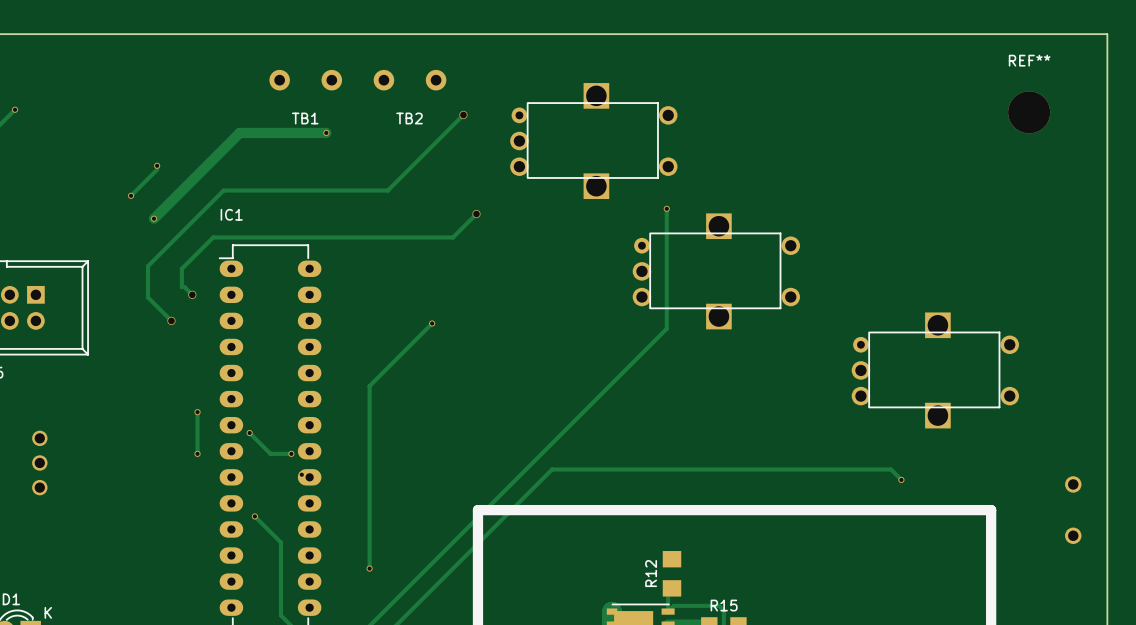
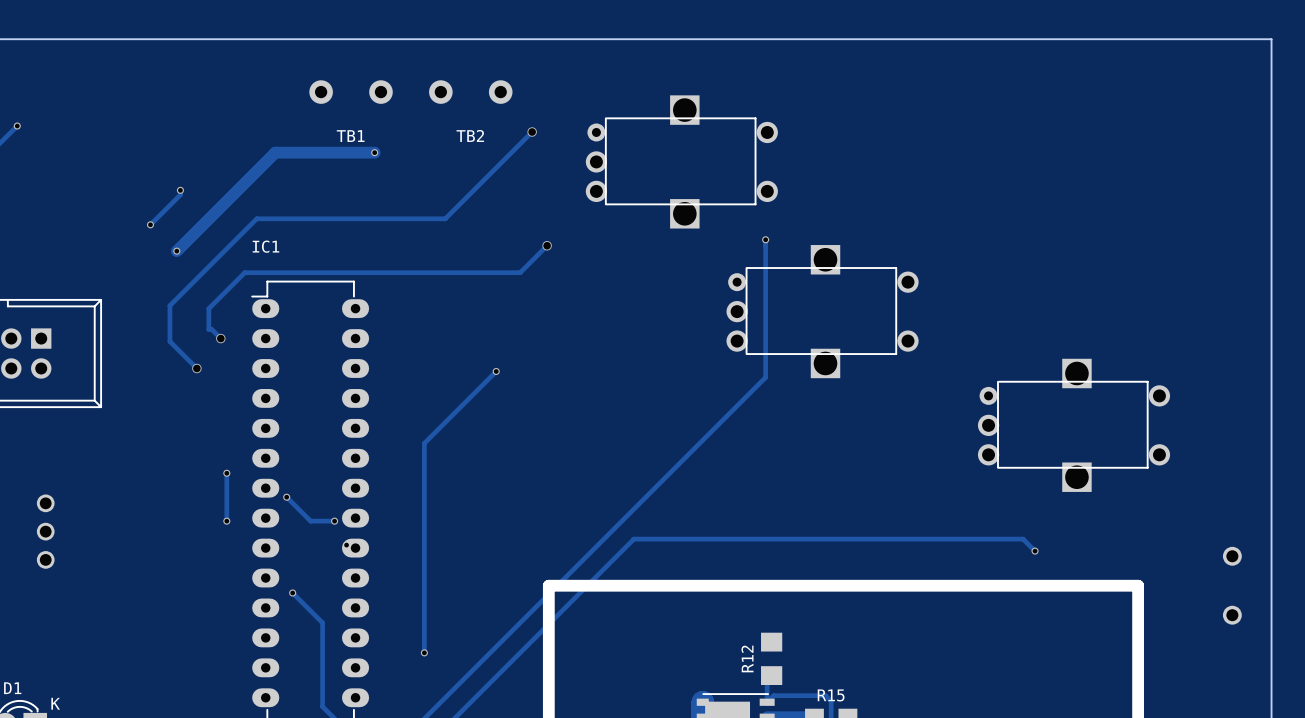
REF**: (1029, 112) -> none

